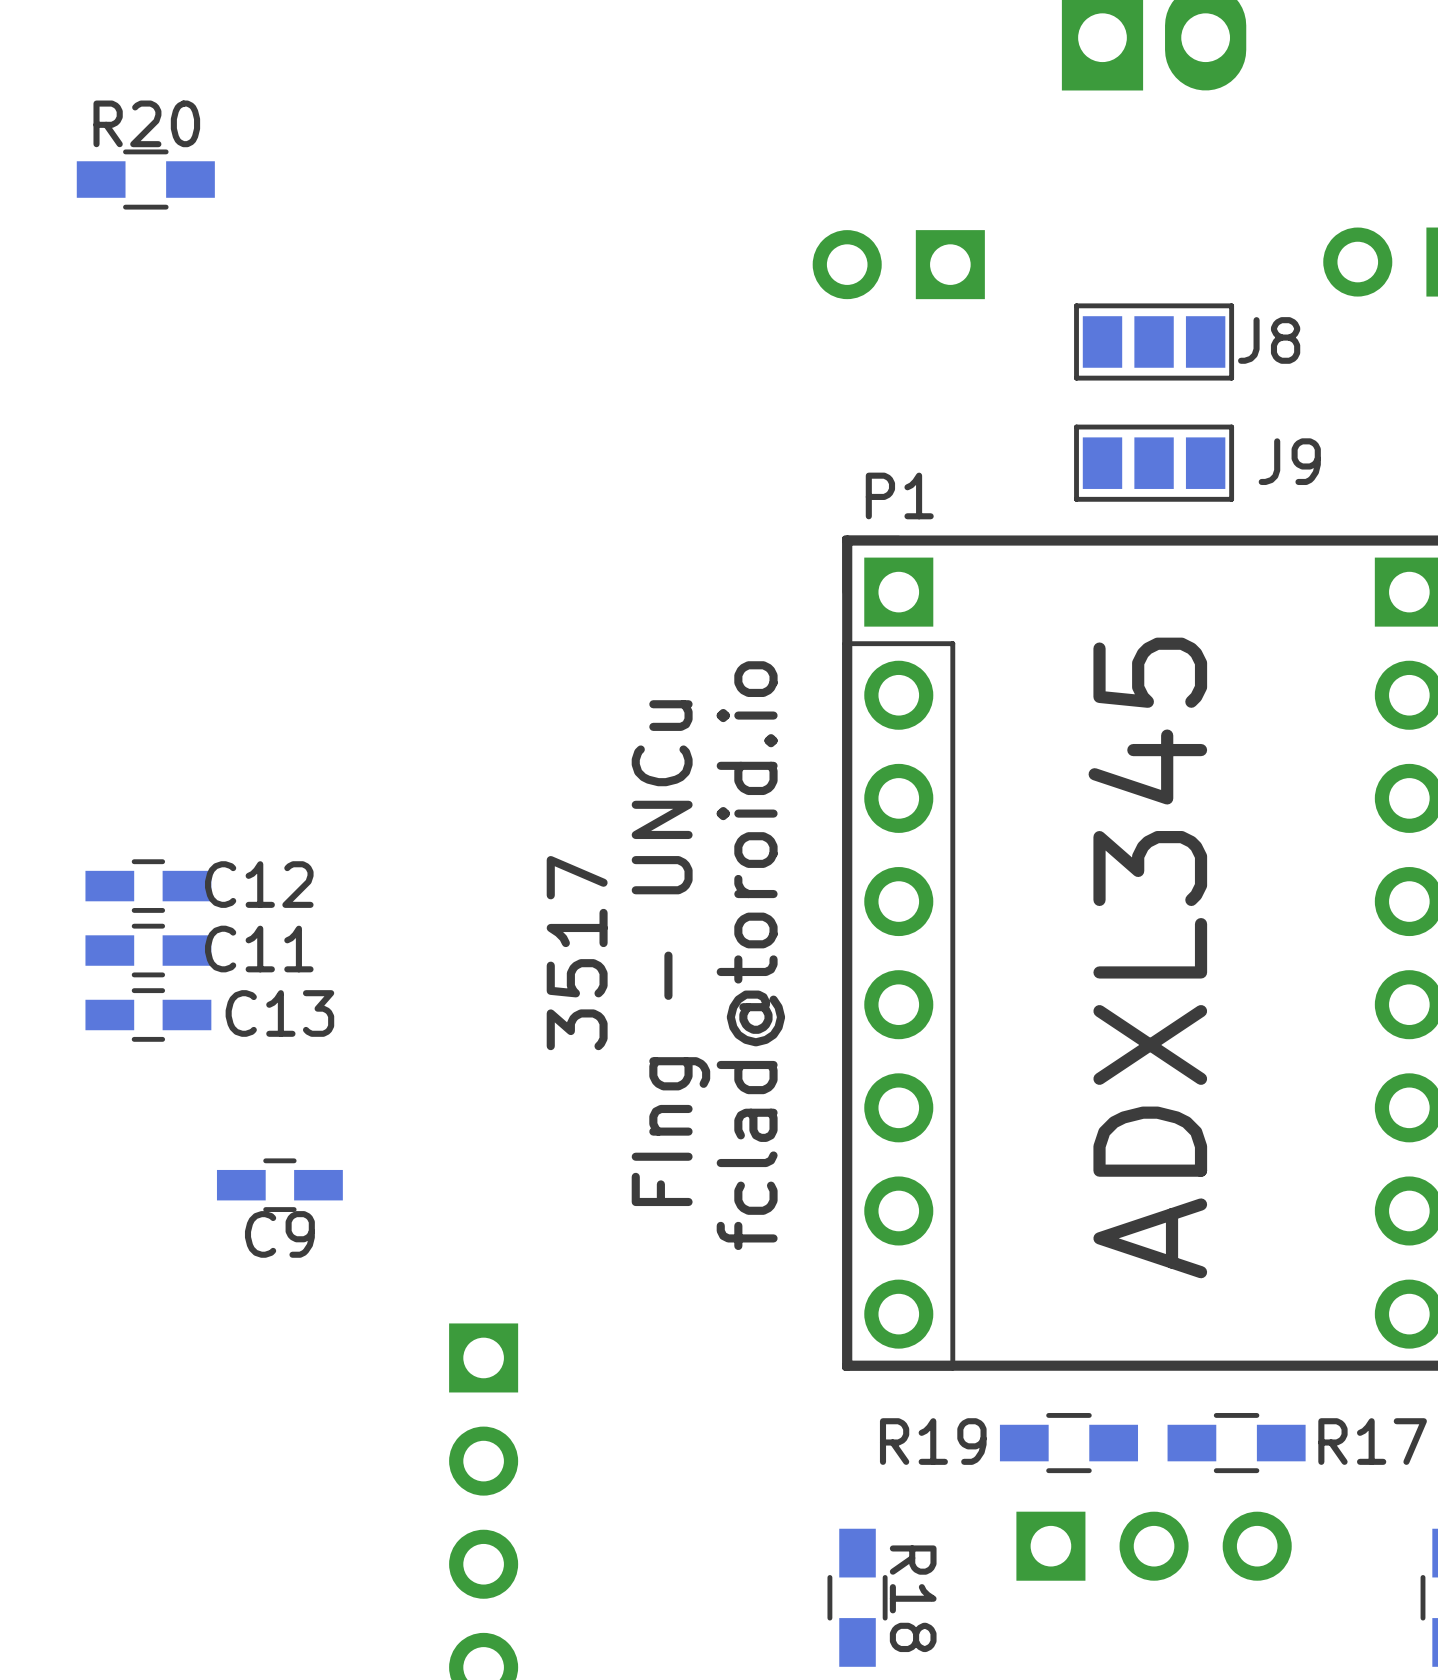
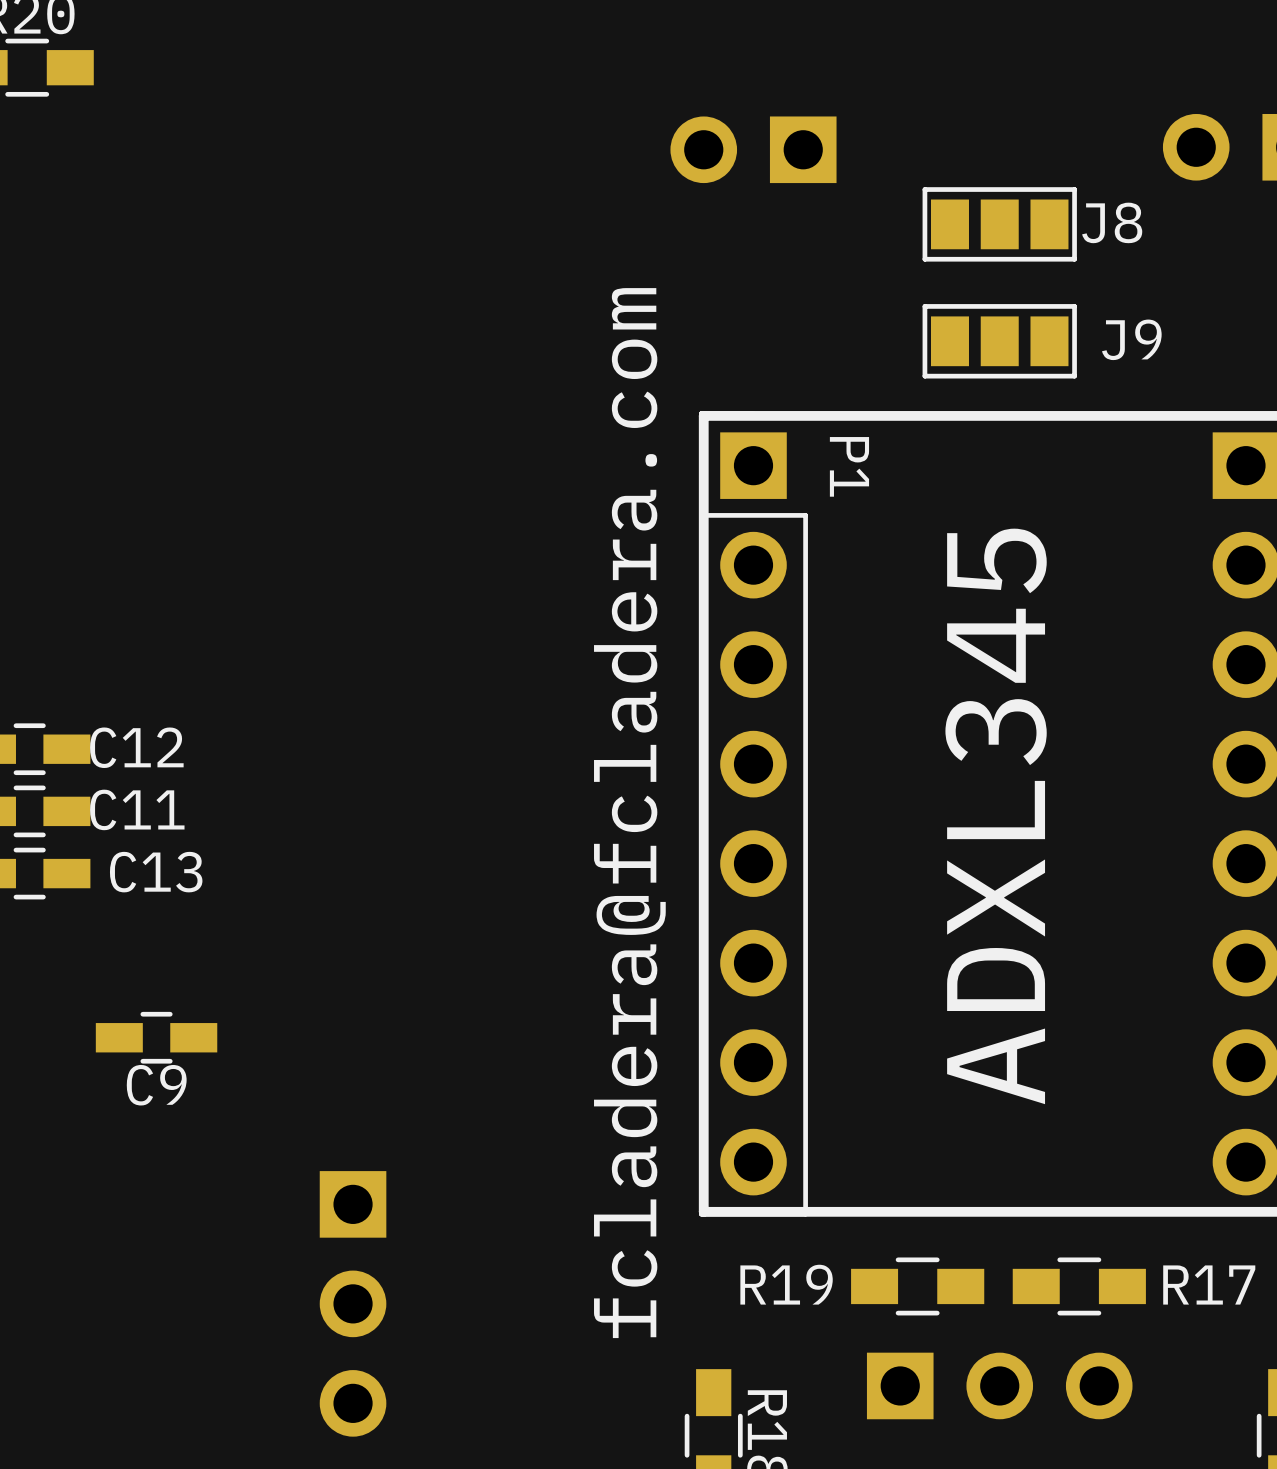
P1 name rotation: 0° (899, 495) -> 90° clockwise (849, 466)
P1 name position: P1 (899, 495) -> P1 (849, 466)
text: 3517 (577, 953) -> none
text: FIng - UNCu (670, 953) -> none
text: fclad@toroid.io (750, 955) -> fcladera@fcladera.com (629, 813)

